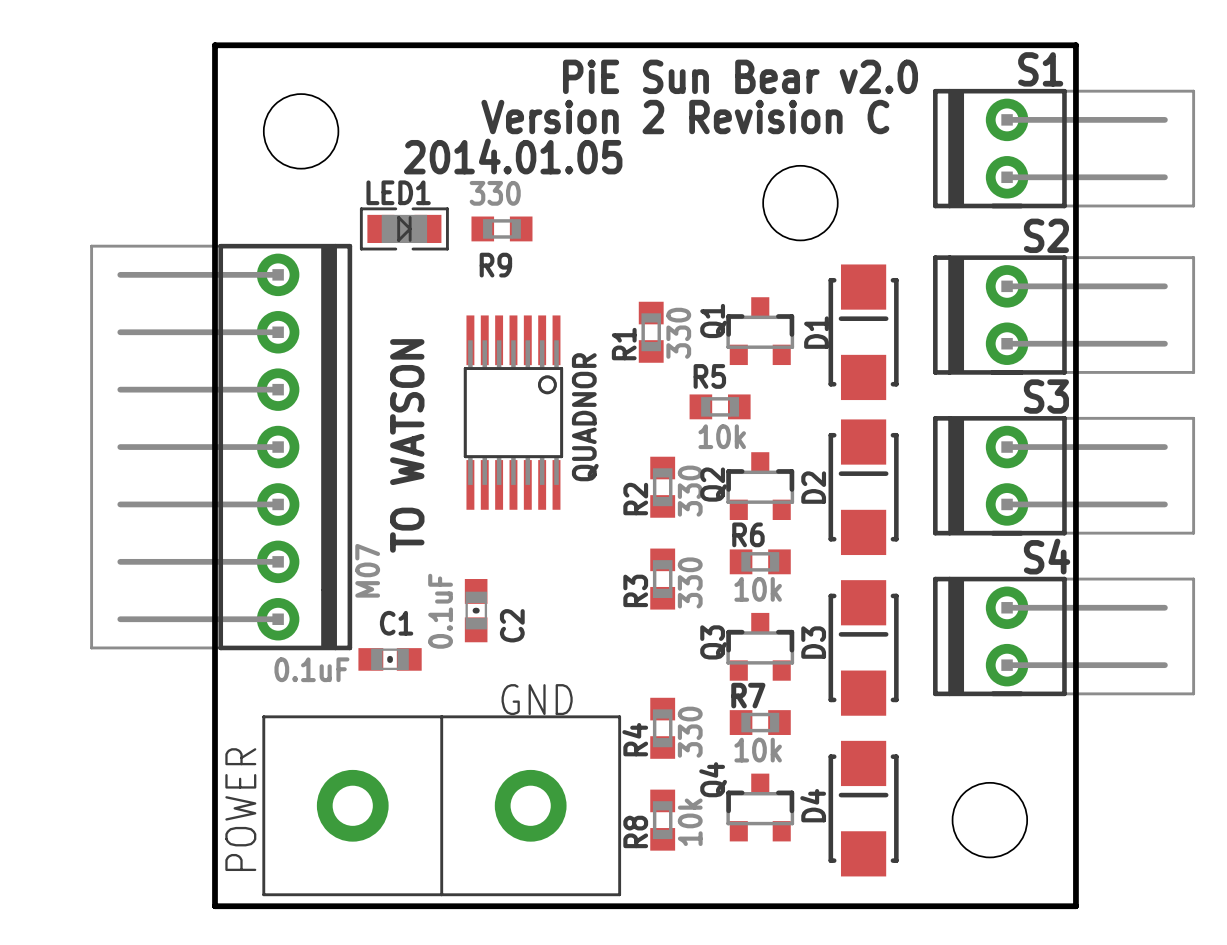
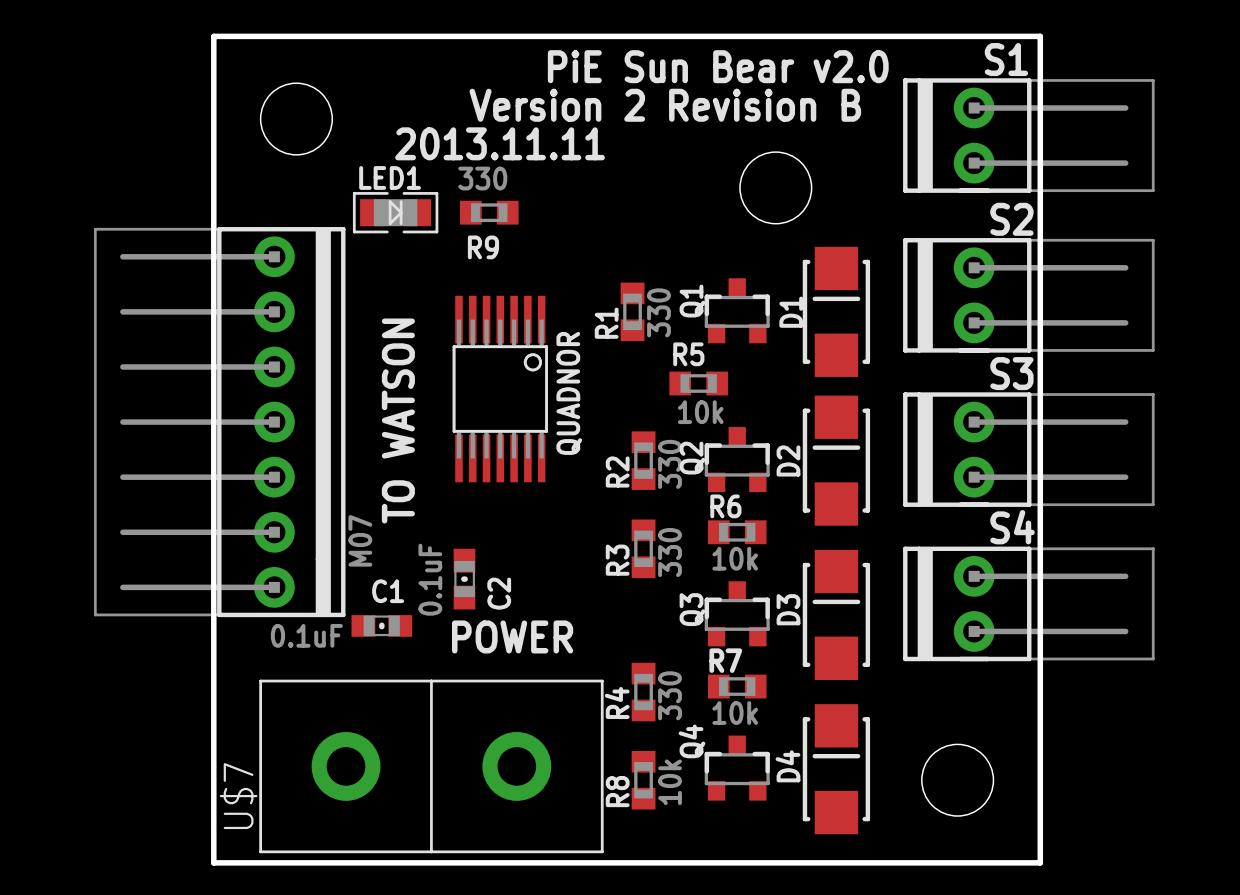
text: Version 2 Revision C (685, 117) -> Version 2 Revision B (665, 105)
text: 2014.01.05 (513, 156) -> 2013.11.11 (500, 143)
text: none -> POWER (512, 636)
text: GND (537, 699) -> none
POWER name: POWER (240, 809) -> U$7 (238, 796)

